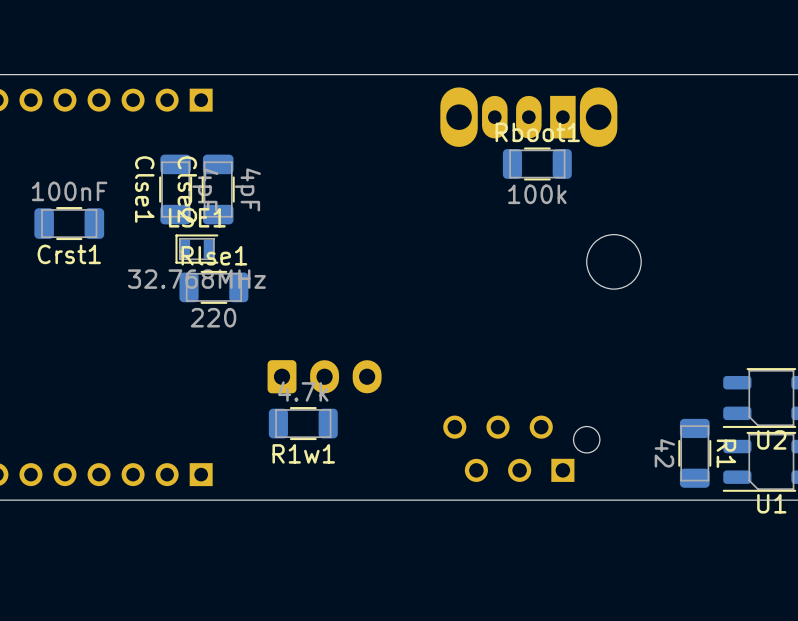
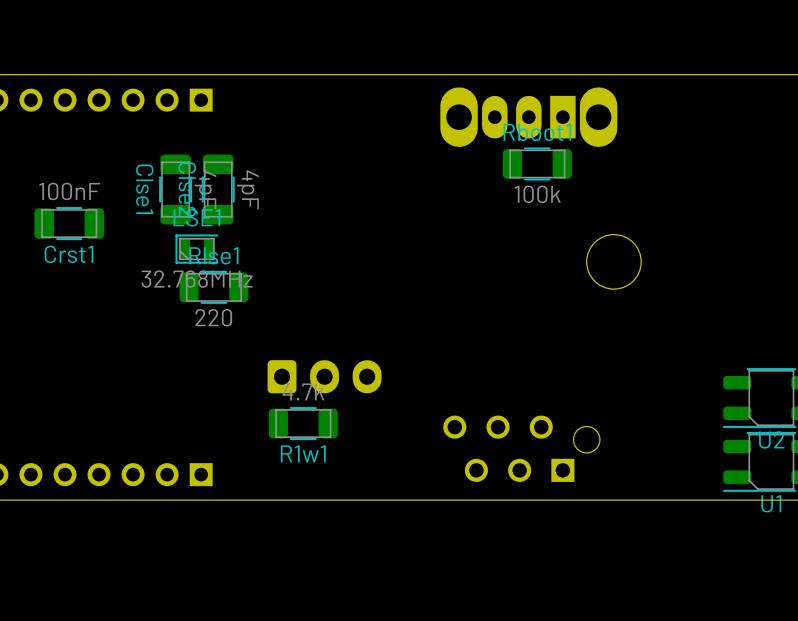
R1: 42 (694, 453) -> none

